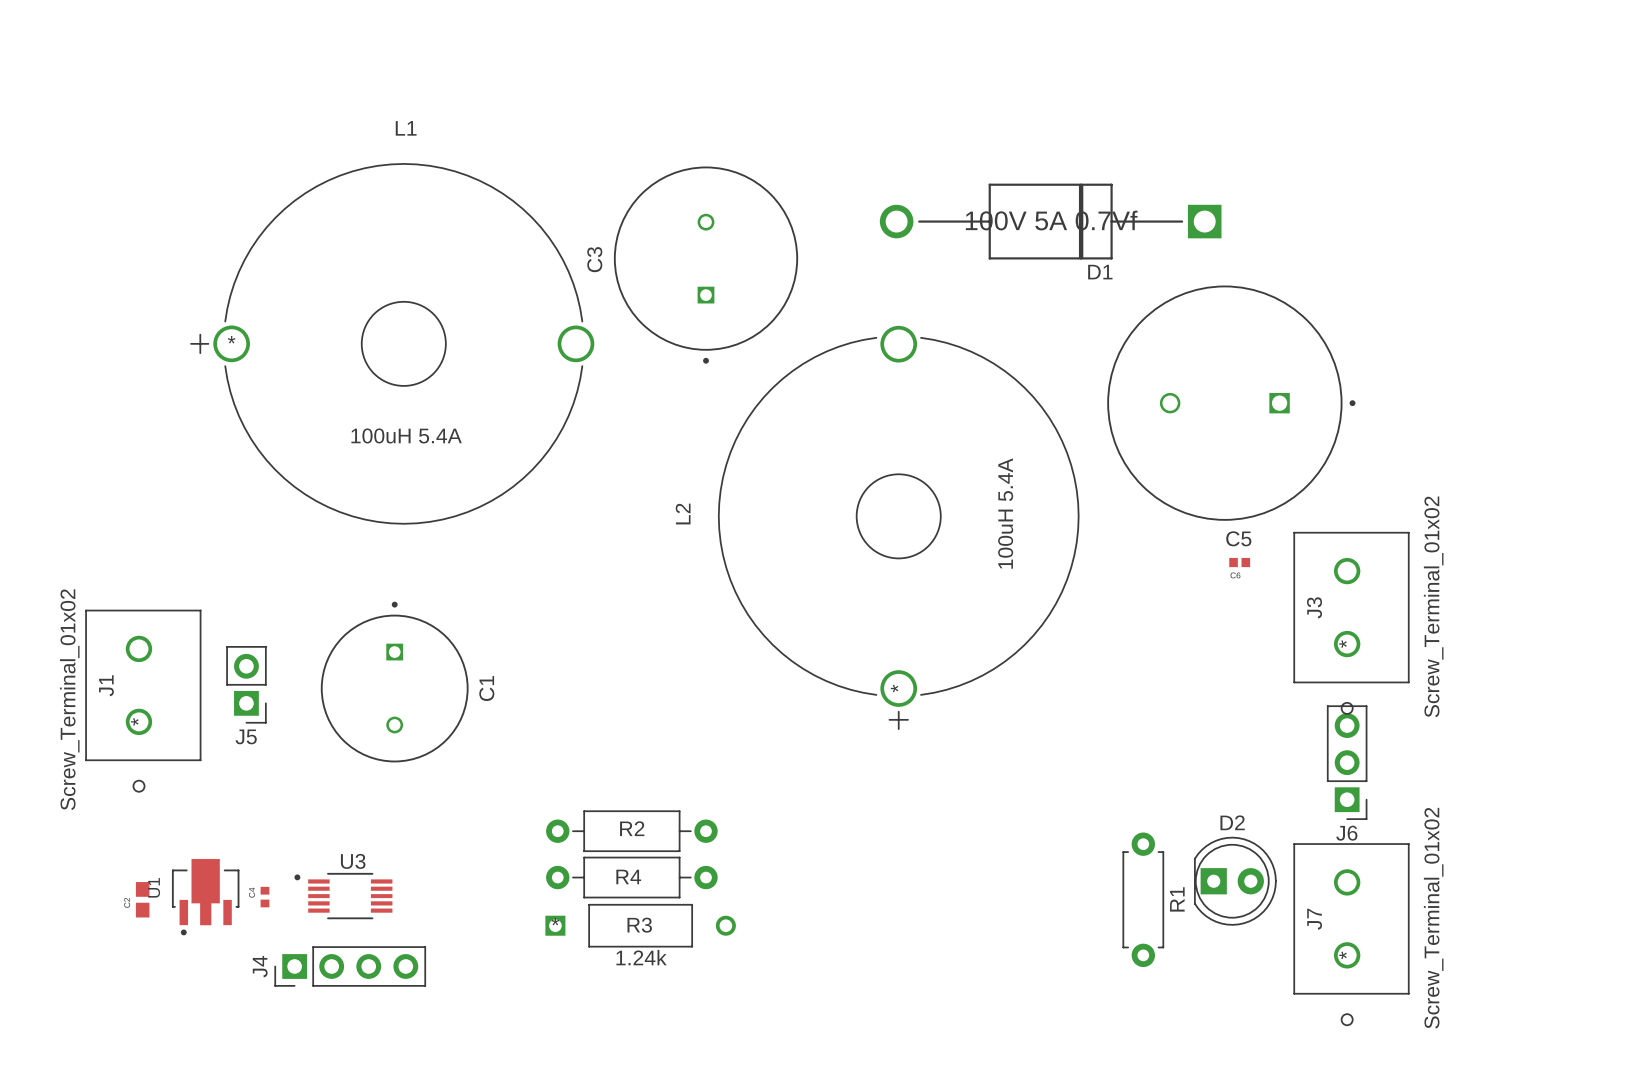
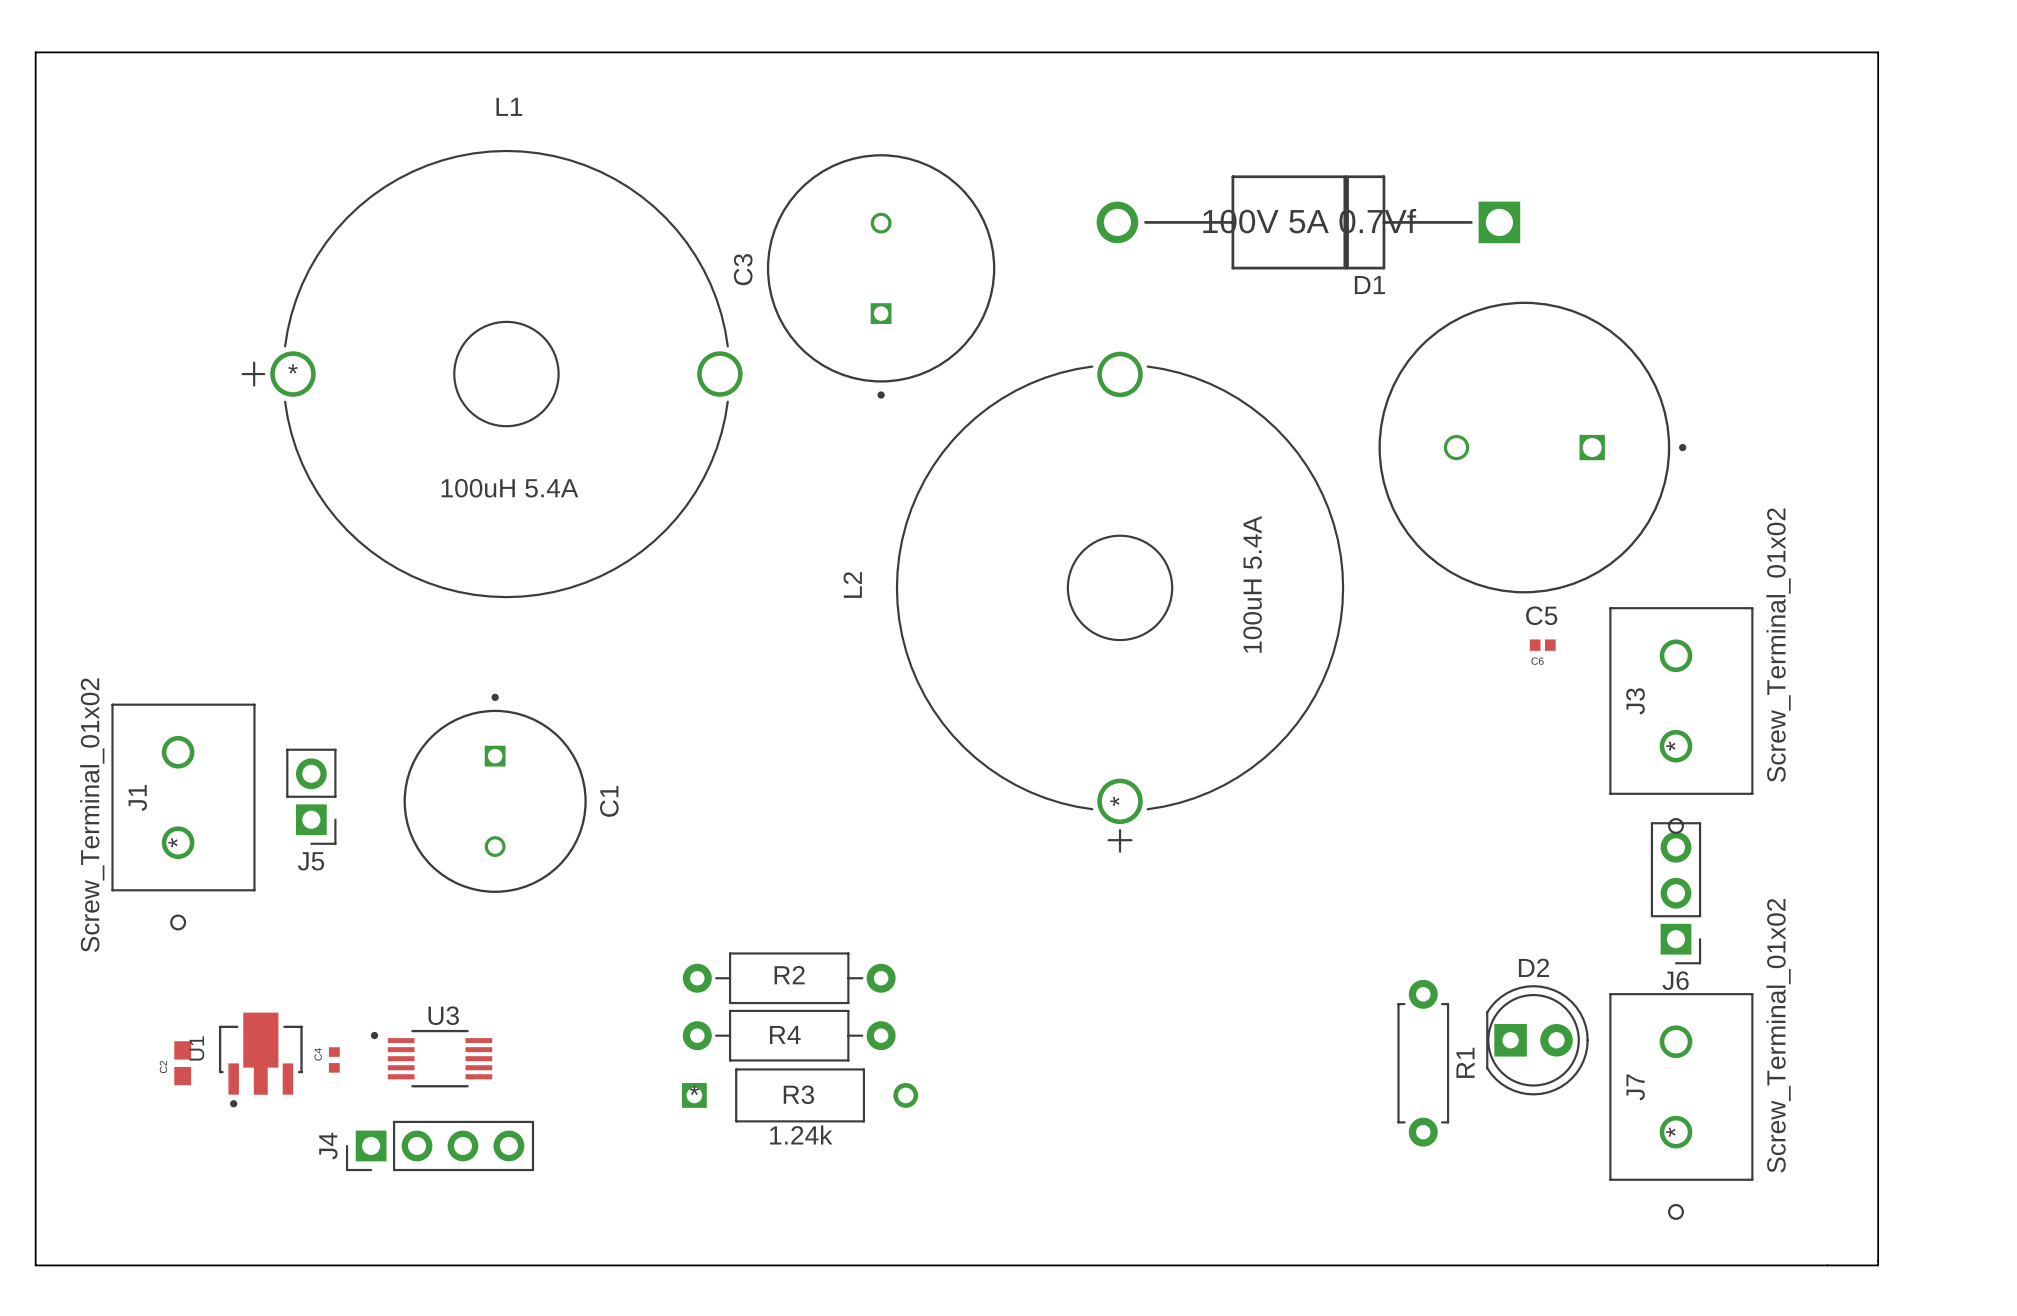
board edge: none -> (35, 52) (1878, 52) (1878, 1265) (35, 1265) (35, 52)
J3 value position: Screw_Terminal_01x02 (1433, 606) -> Screw_Terminal_01x02 (1778, 645)
J7 value position: Screw_Terminal_01x02 (1433, 918) -> Screw_Terminal_01x02 (1778, 1035)

